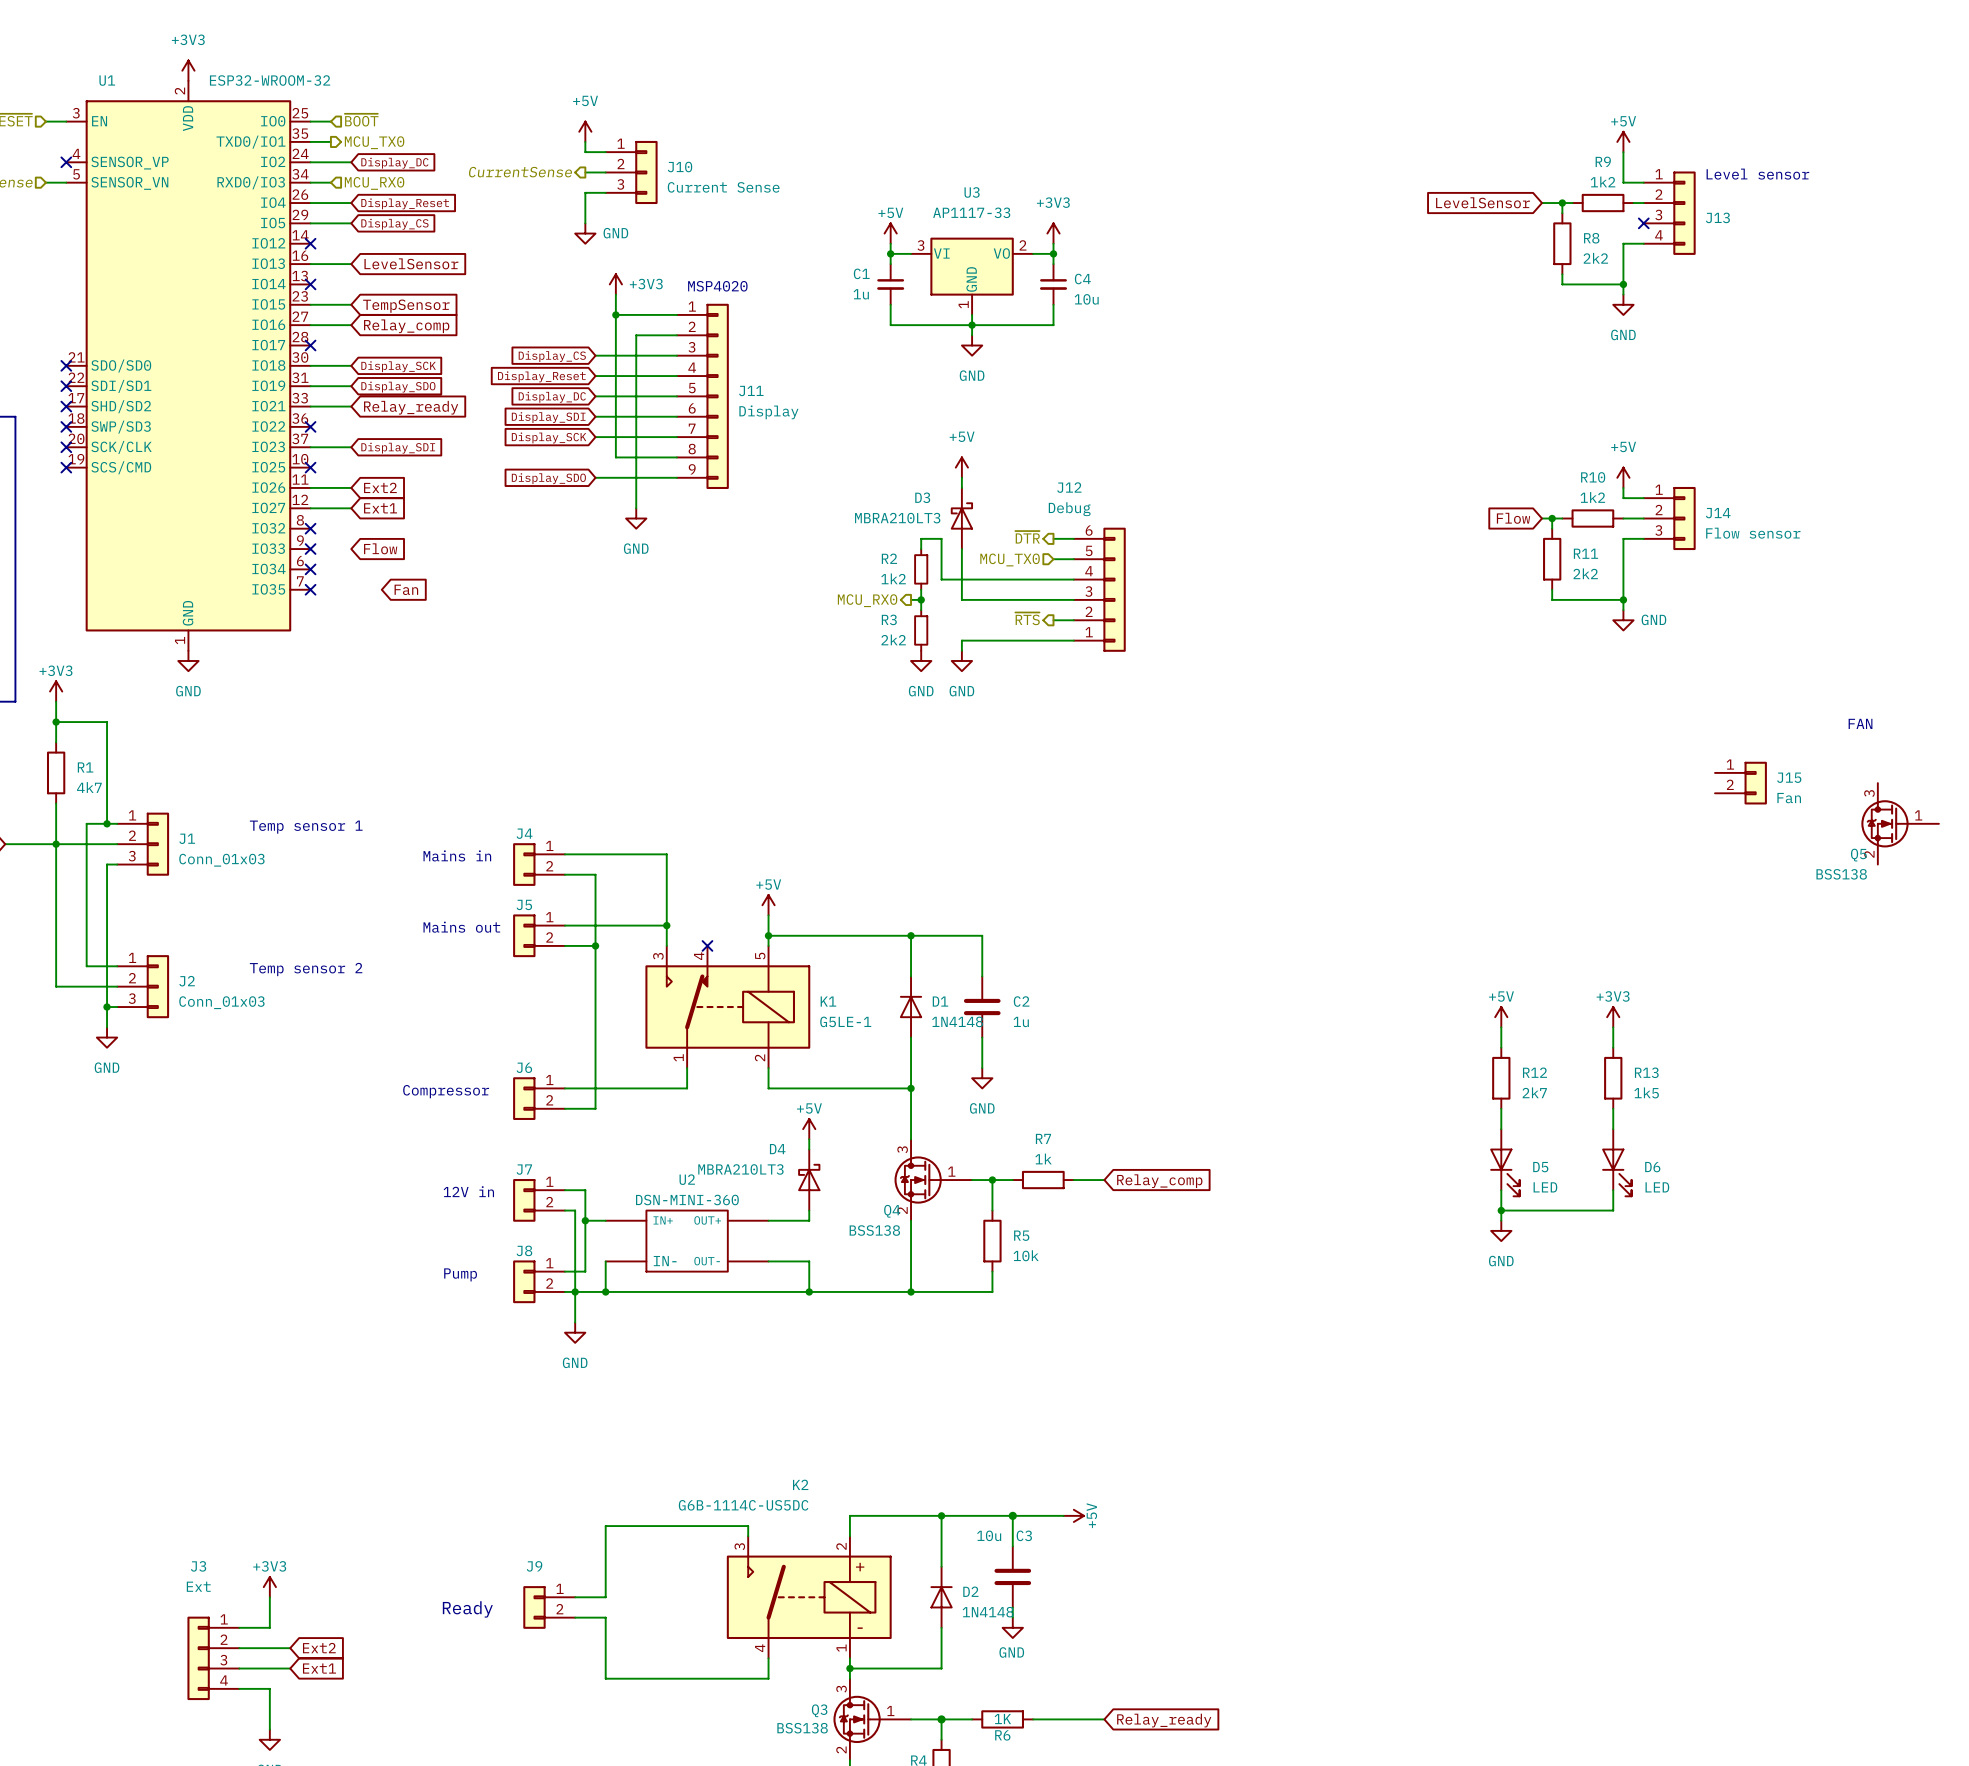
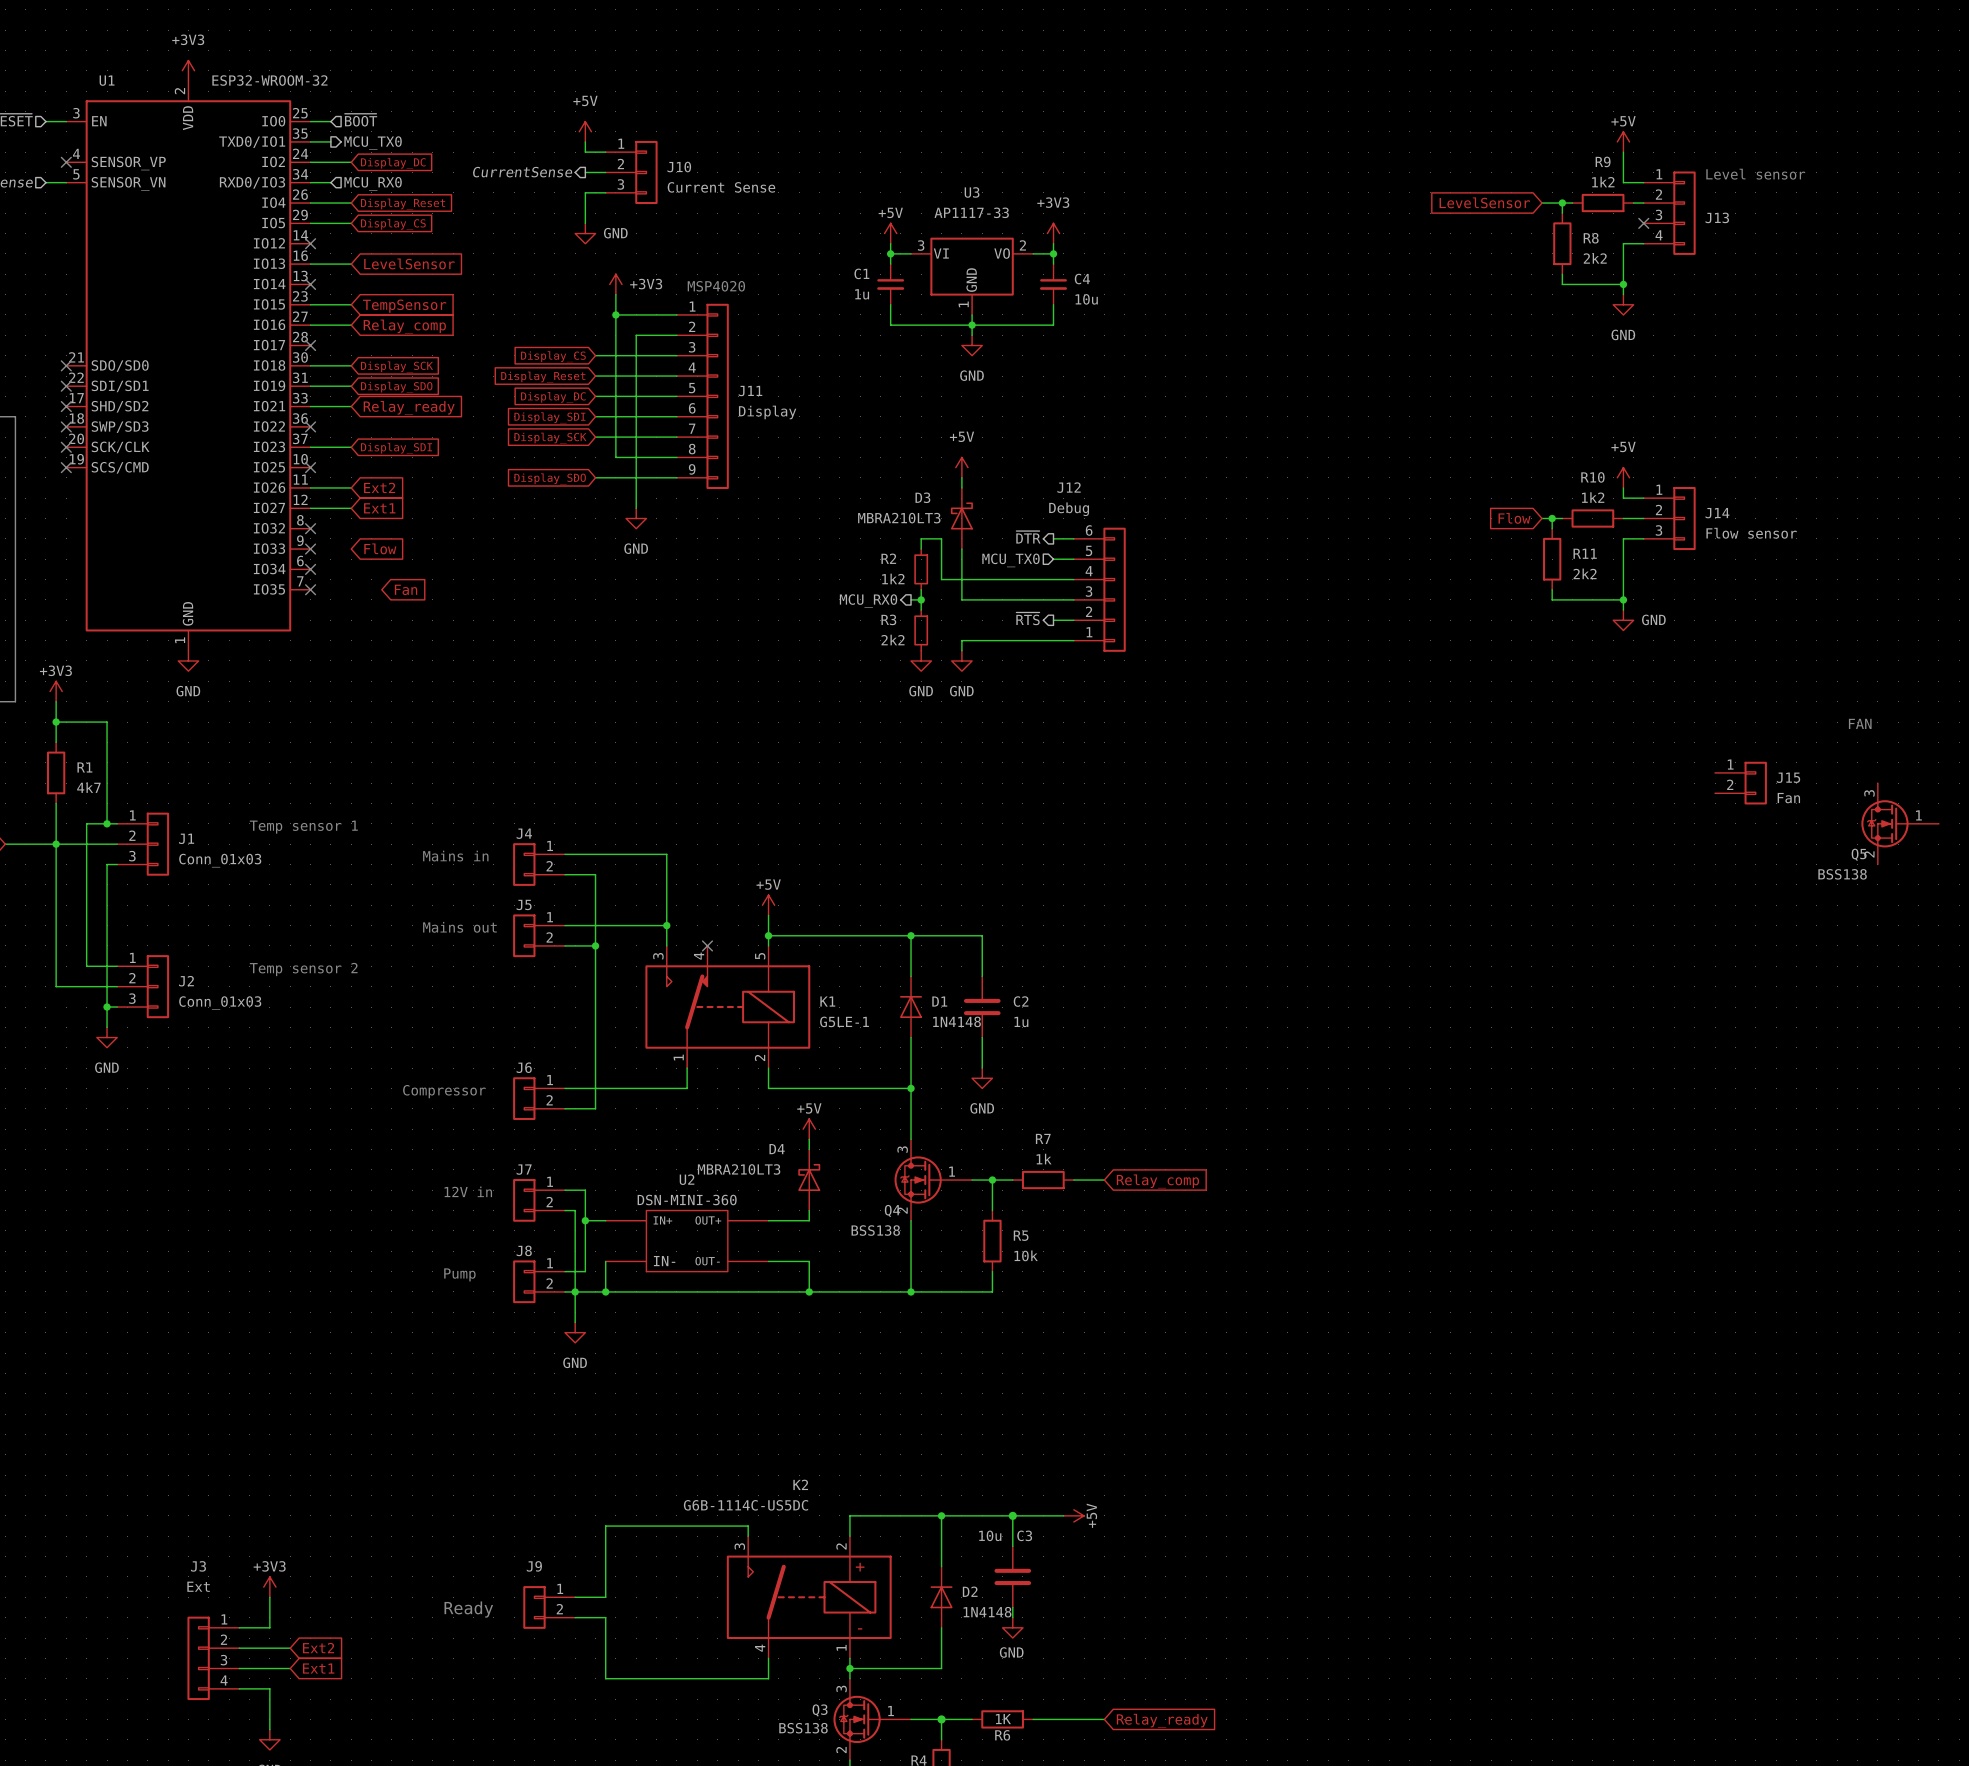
power symbol: +5V (1501, 1017) -> none
power symbol: +3V3 (1613, 1017) -> none
wire: (1501, 1027) (1501, 1047) -> none
wire: (1613, 1027) (1613, 1047) -> none
R12: 2k7 (1501, 1078) -> none
R13: 1k5 (1613, 1078) -> none
wire: (1501, 1108) (1501, 1129) -> none
wire: (1613, 1108) (1613, 1129) -> none
D5: LED (1504, 1162) -> none
D6: LED (1616, 1162) -> none
wire: (1501, 1190) (1501, 1220) -> none
wire: (1613, 1190) (1613, 1210) (1501, 1210) -> none
junction: (1501, 1210) -> none
power symbol: GND (1501, 1230) -> none

